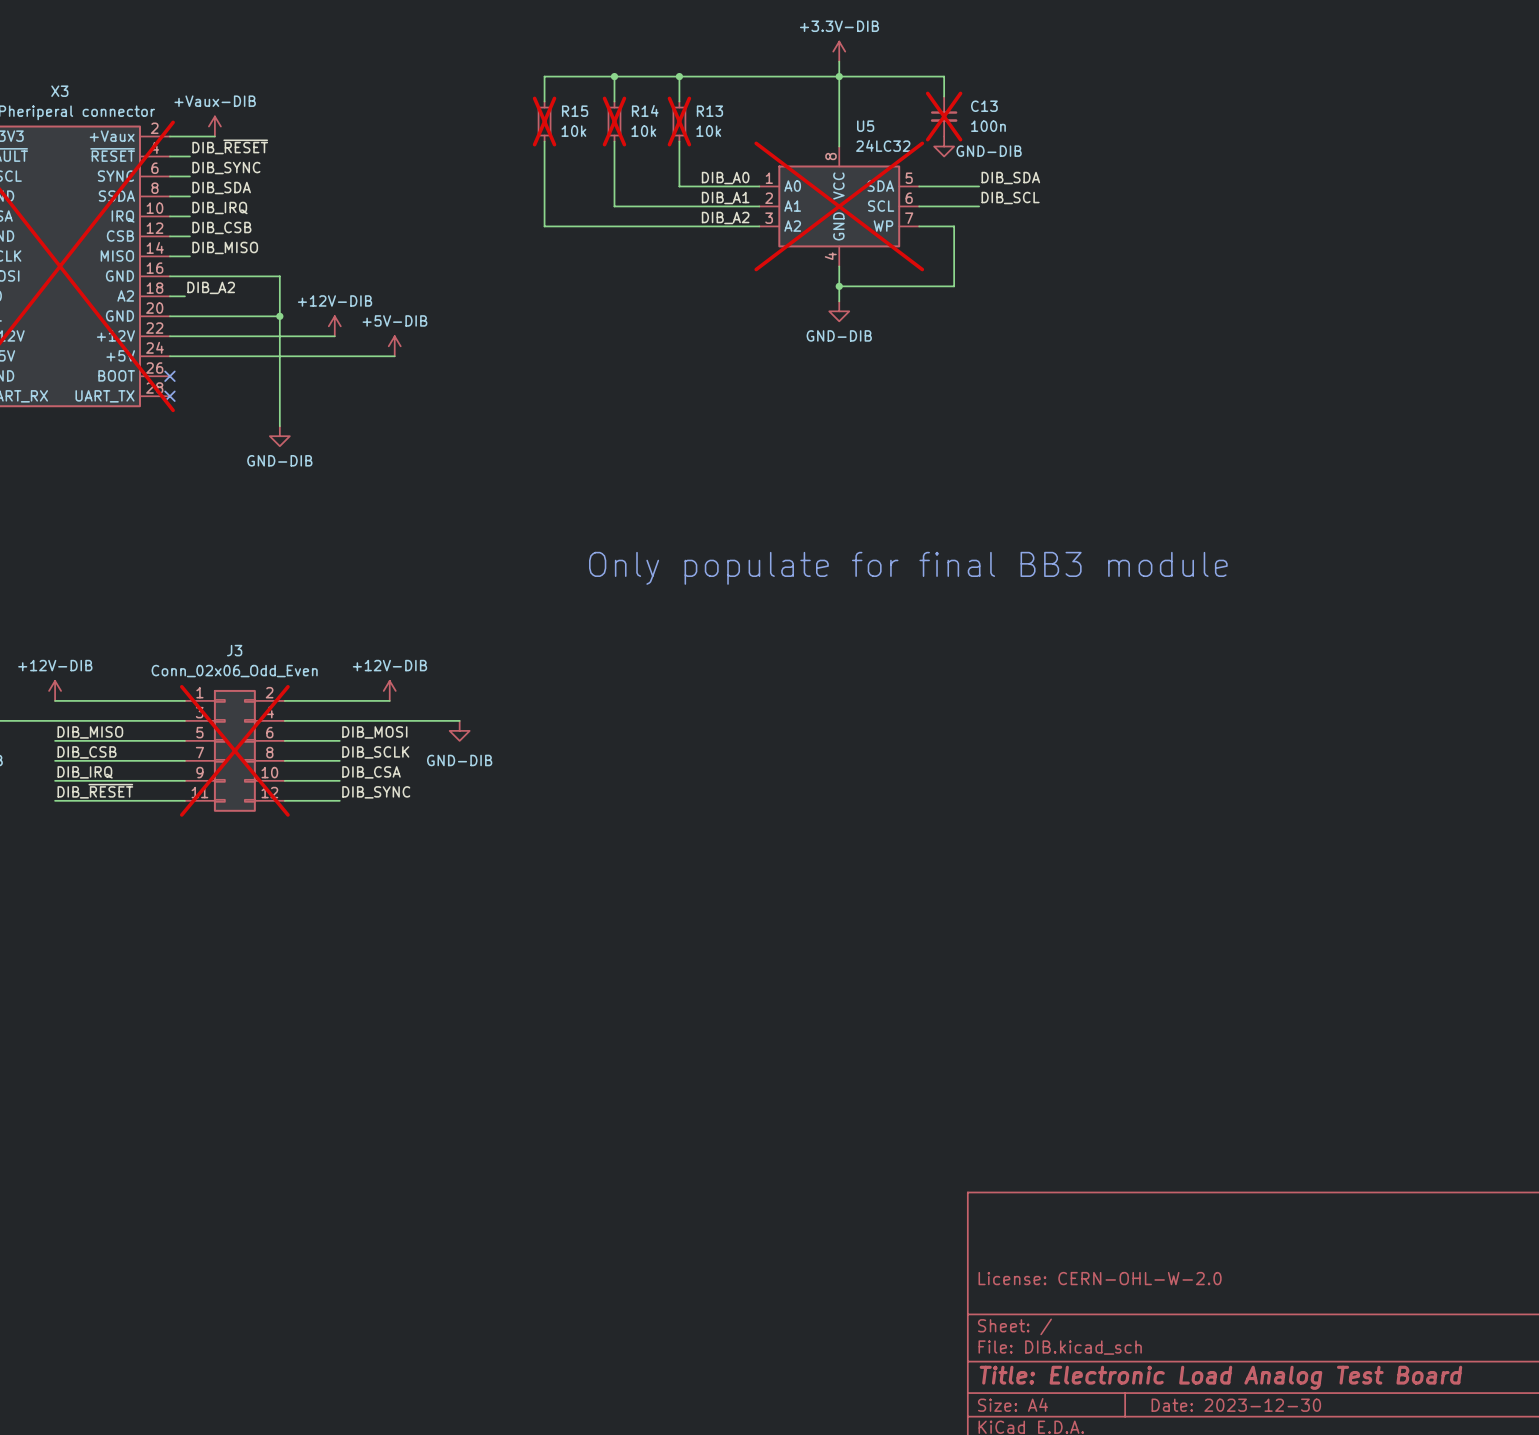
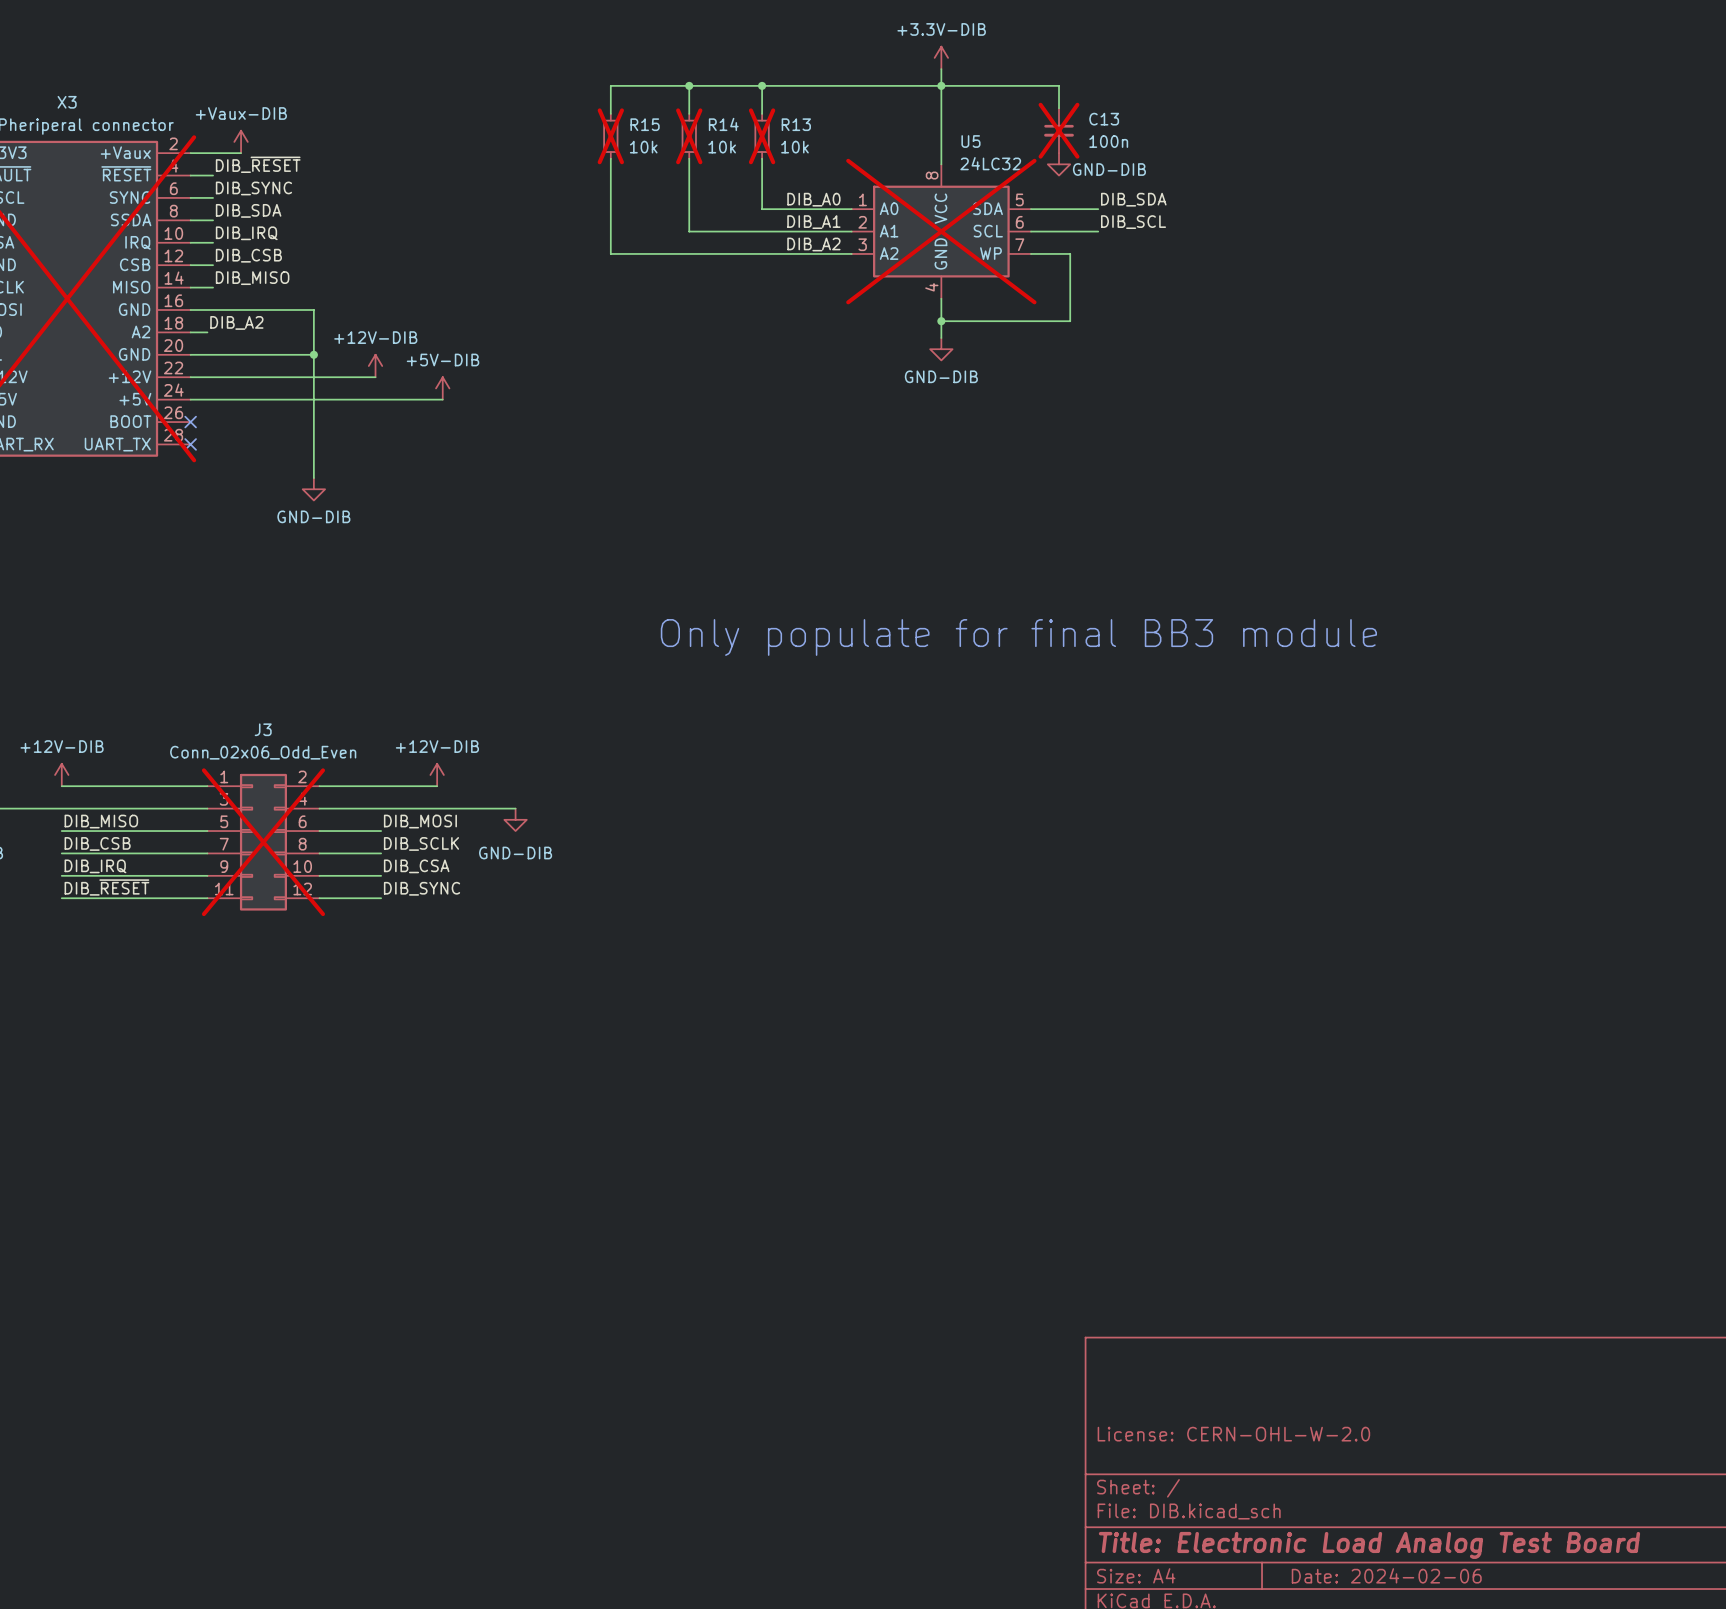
title block: Date: 2023-12-30 (1236, 1405) -> Date: 2024-02-06 (1386, 1575)

